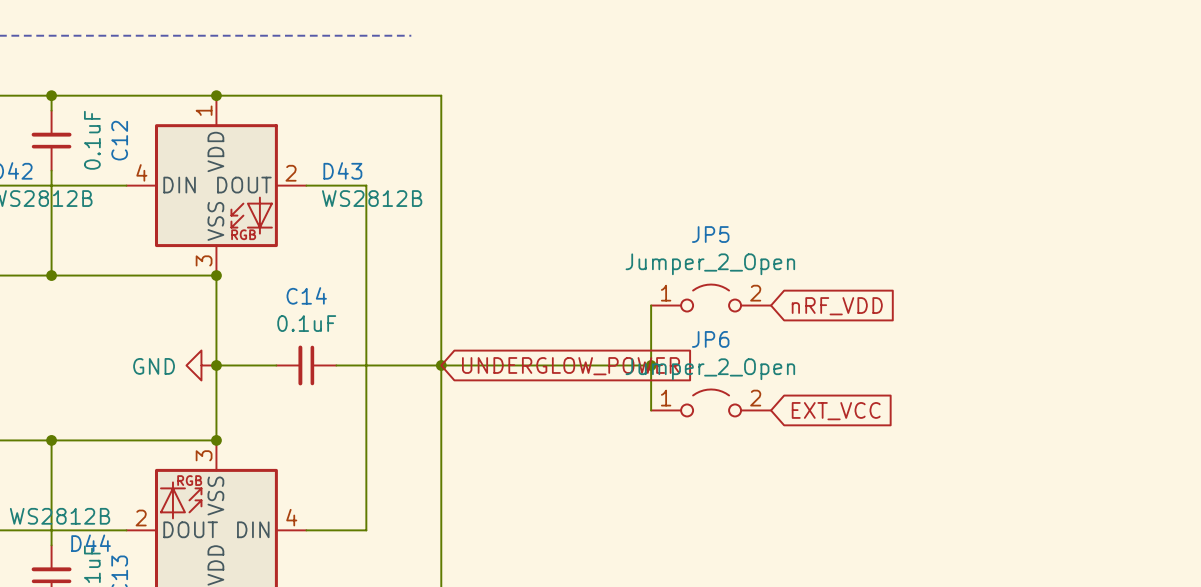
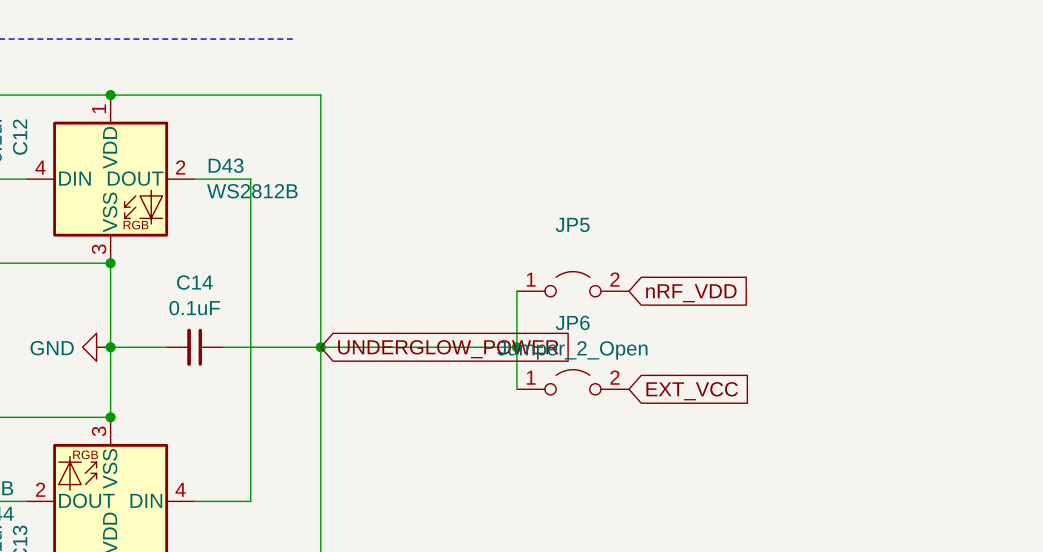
JP5 value: Jumper_2_Open (710, 264) -> none

